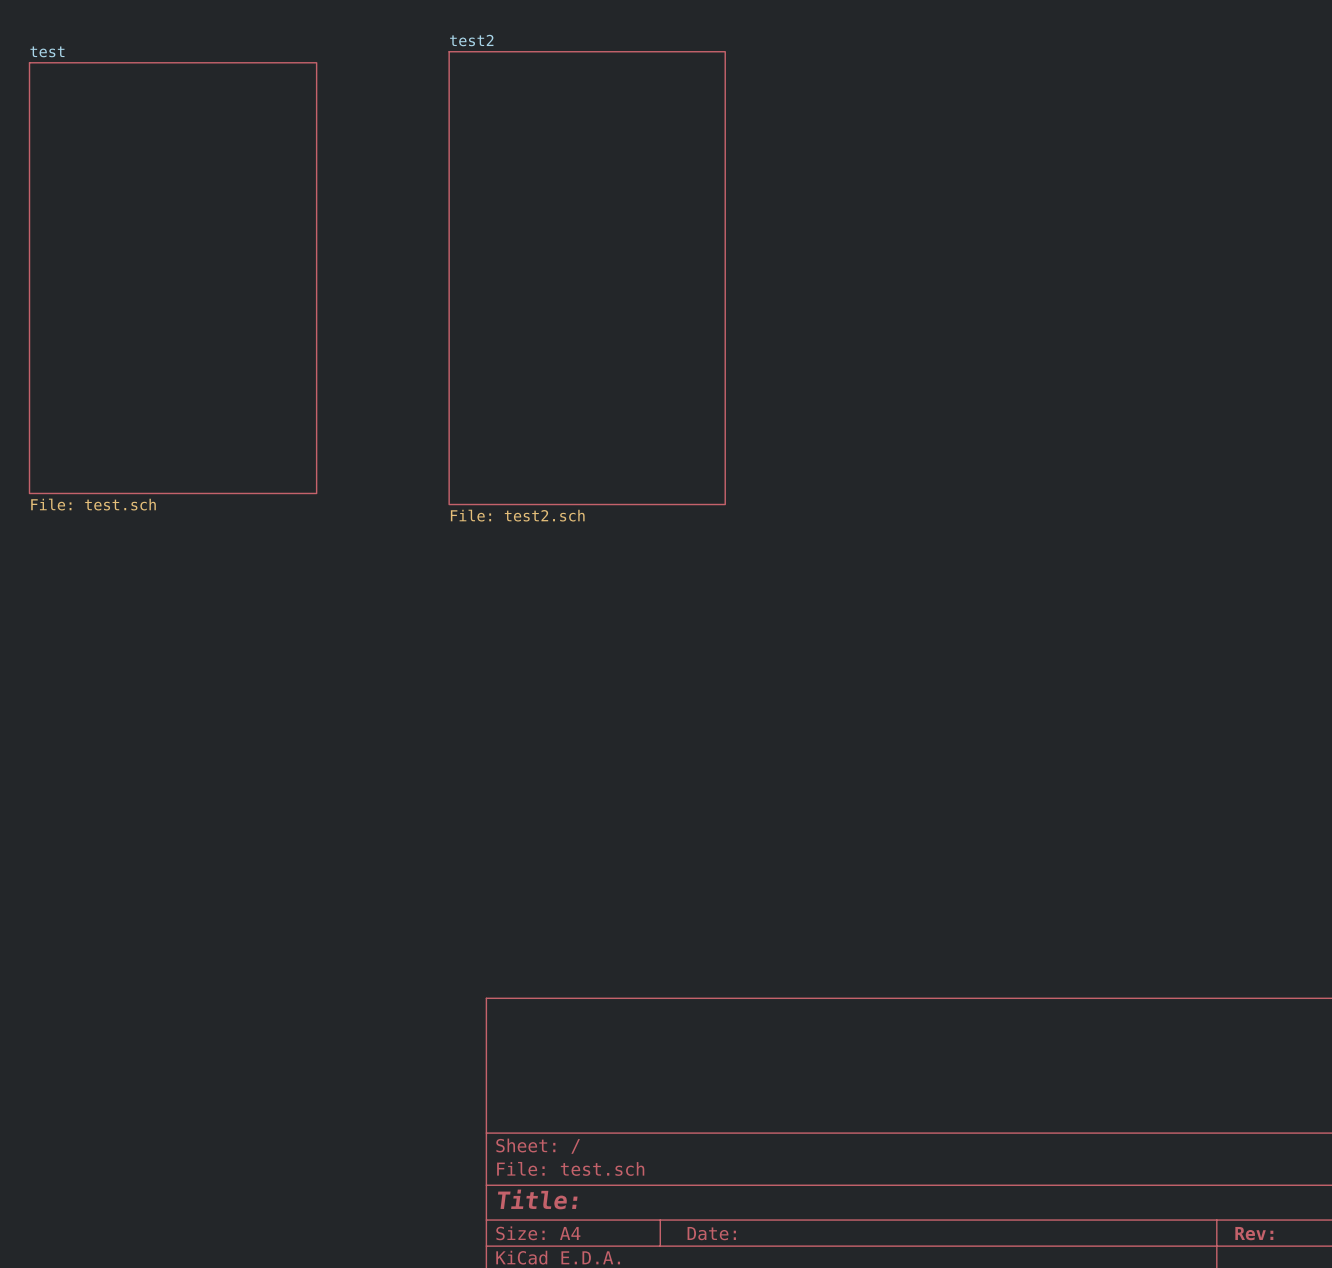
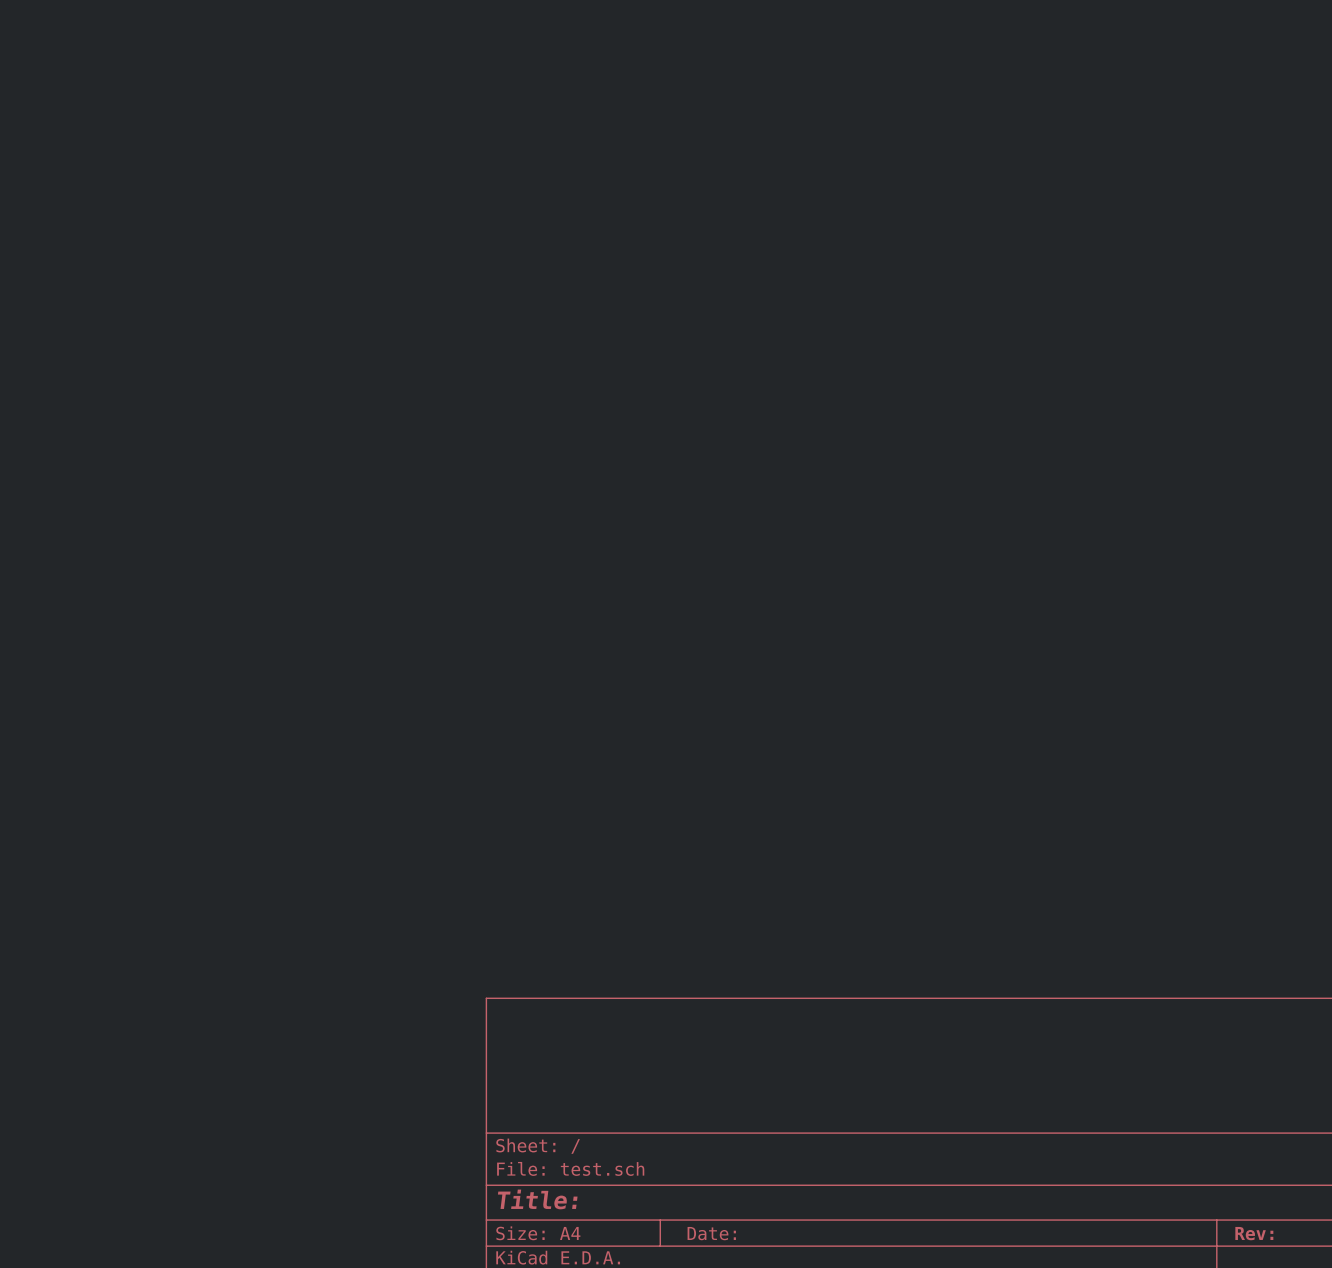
sheet test: File: test.sch (173, 278) -> none
sheet test2: File: test2.sch (587, 278) -> none

